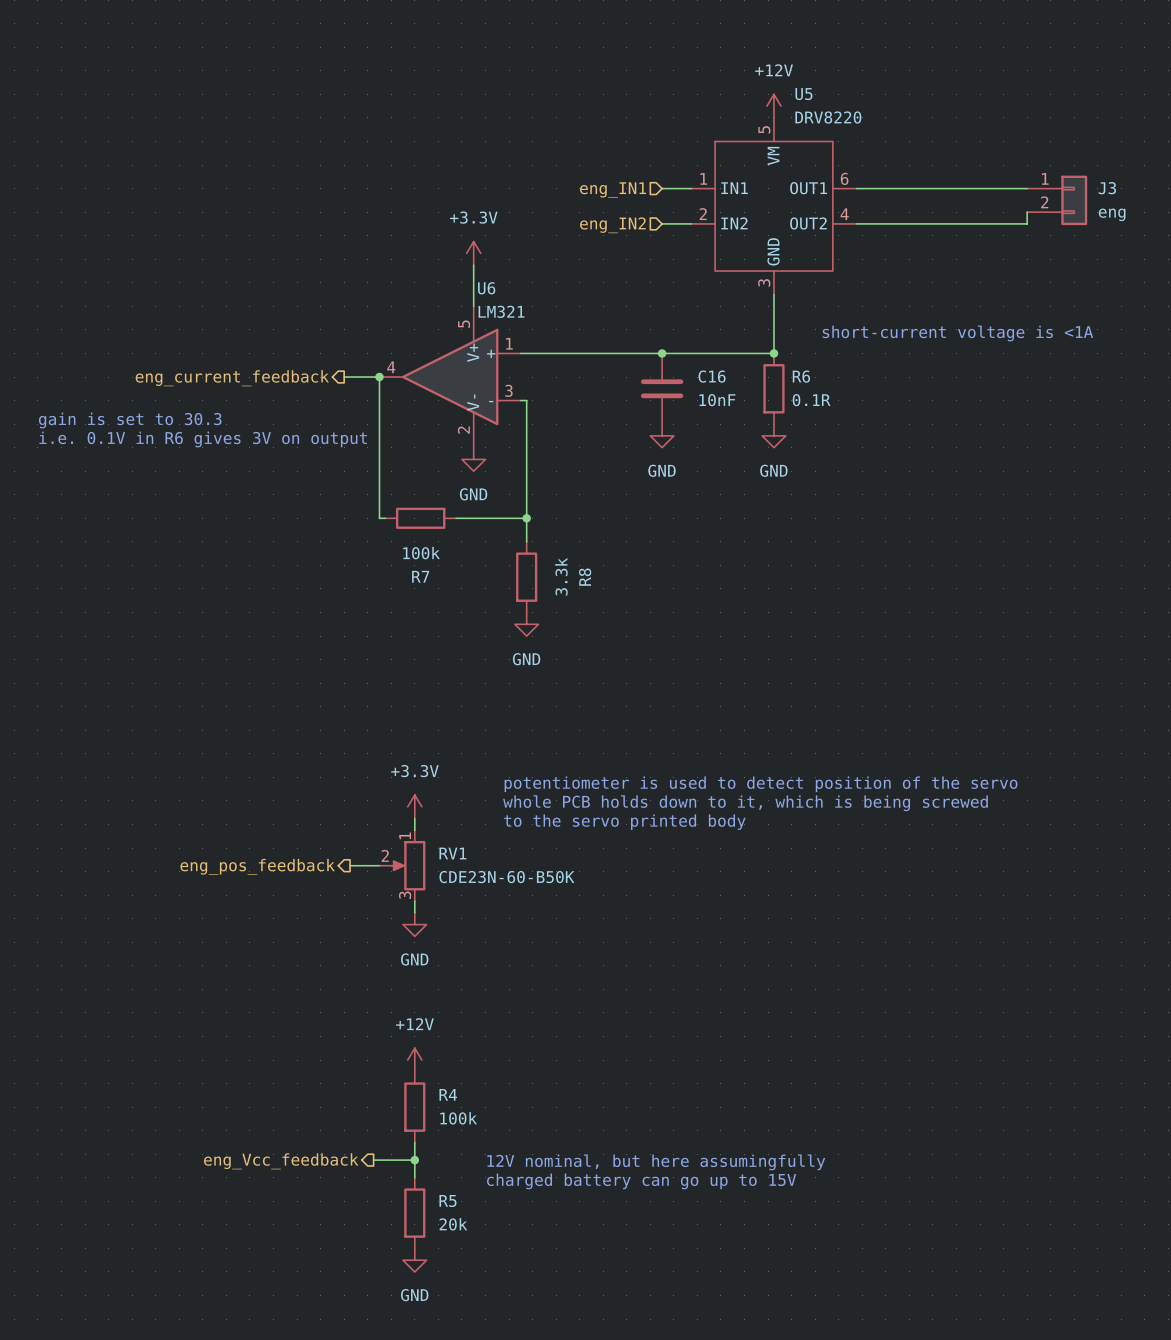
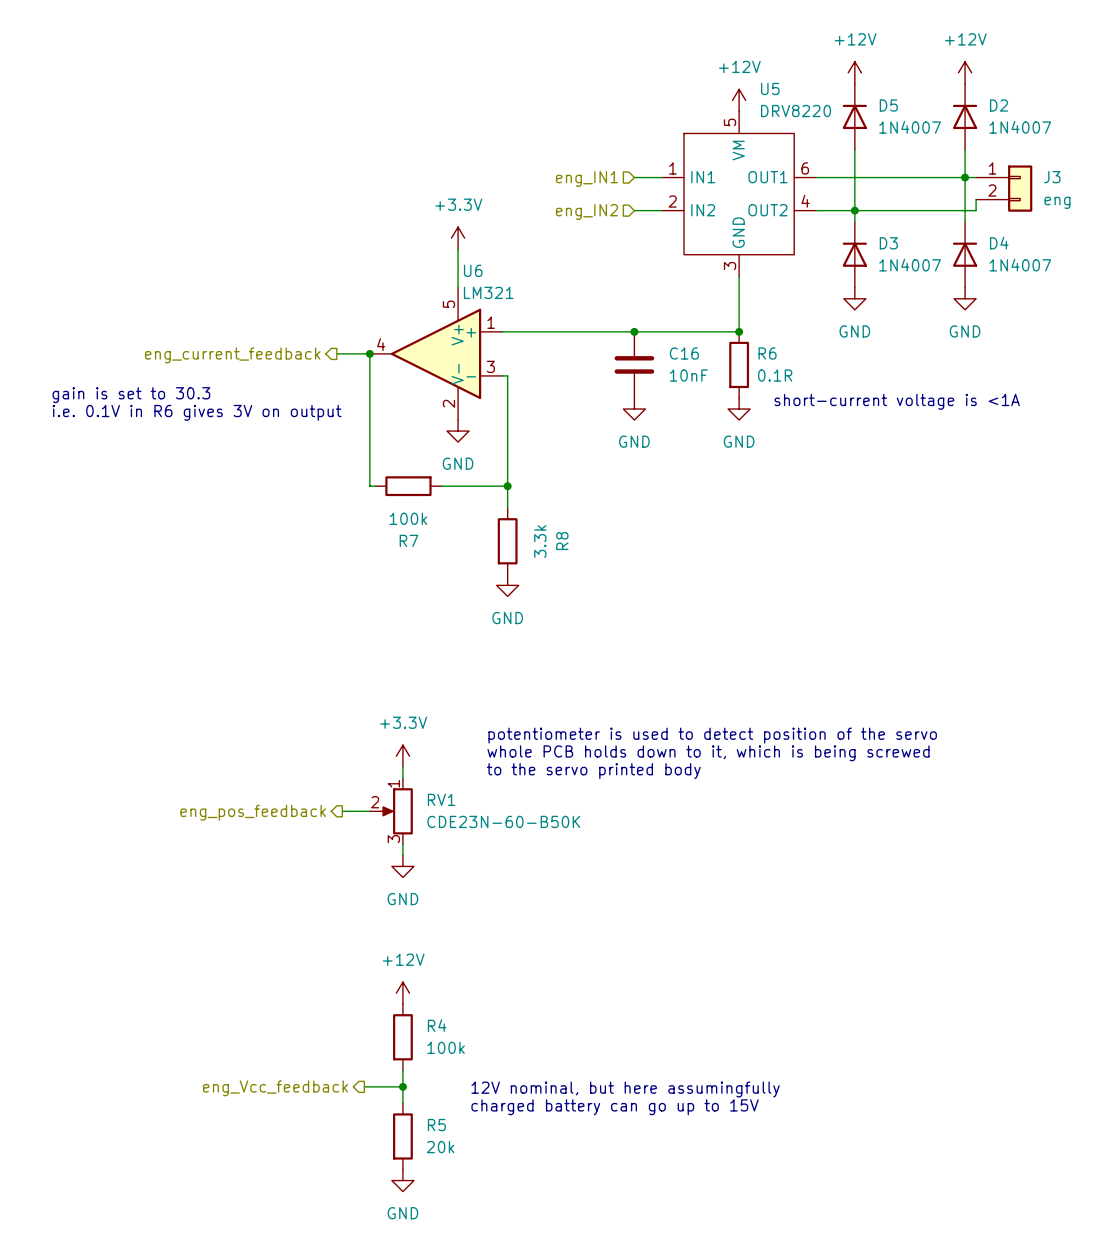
power symbol: none -> +12V (854, 72)
power symbol: none -> +12V (965, 72)
D5: none -> 1N4007 (854, 116)
D2: none -> 1N4007 (965, 116)
wire: none -> (854, 150) (854, 221)
wire: none -> (965, 150) (965, 221)
junction: none -> (965, 177)
junction: none -> (854, 210)
D3: none -> 1N4007 (854, 254)
D4: none -> 1N4007 (965, 254)
power symbol: none -> GND (854, 298)
power symbol: none -> GND (965, 298)
text position: short-current voltage is <1A (957, 333) -> short-current voltage is <1A (897, 401)

